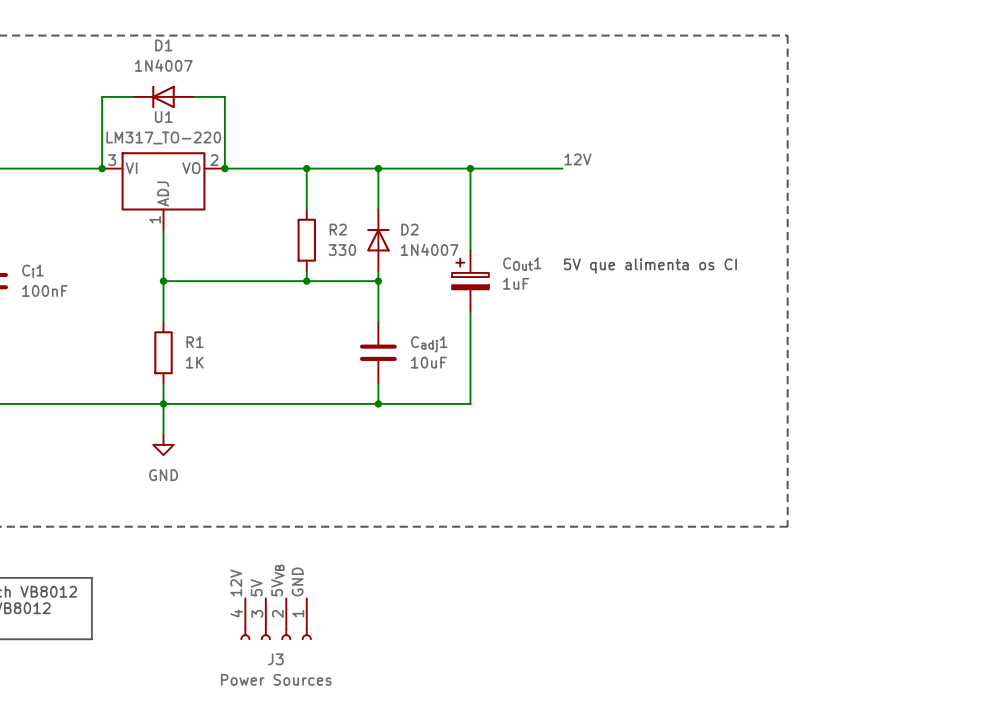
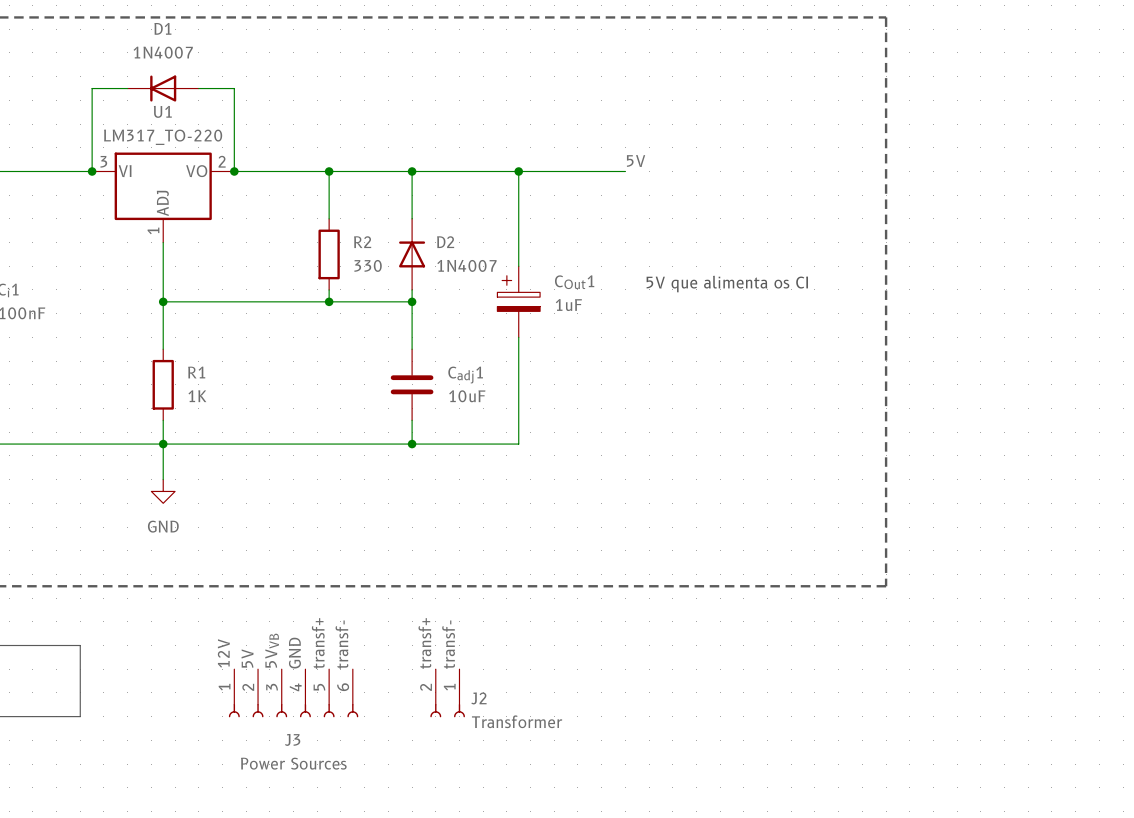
label: 12V (577, 159) -> 5V (636, 161)
label: none -> transf- (341, 644)
label: none -> transf+ (424, 643)
label: none -> transf- (448, 644)
label: 5VVB (277, 580) -> GND (294, 653)
label: GND (297, 581) -> transf+ (318, 643)
label: none -> 12V (223, 653)
label: 12V (236, 582) -> 5V (247, 658)
label: 5V (256, 587) -> 5VVB (272, 650)
J3 symbol: [240, 598, 312, 640] -> [228, 669, 359, 718]
J2: none -> Transformer (447, 693)

